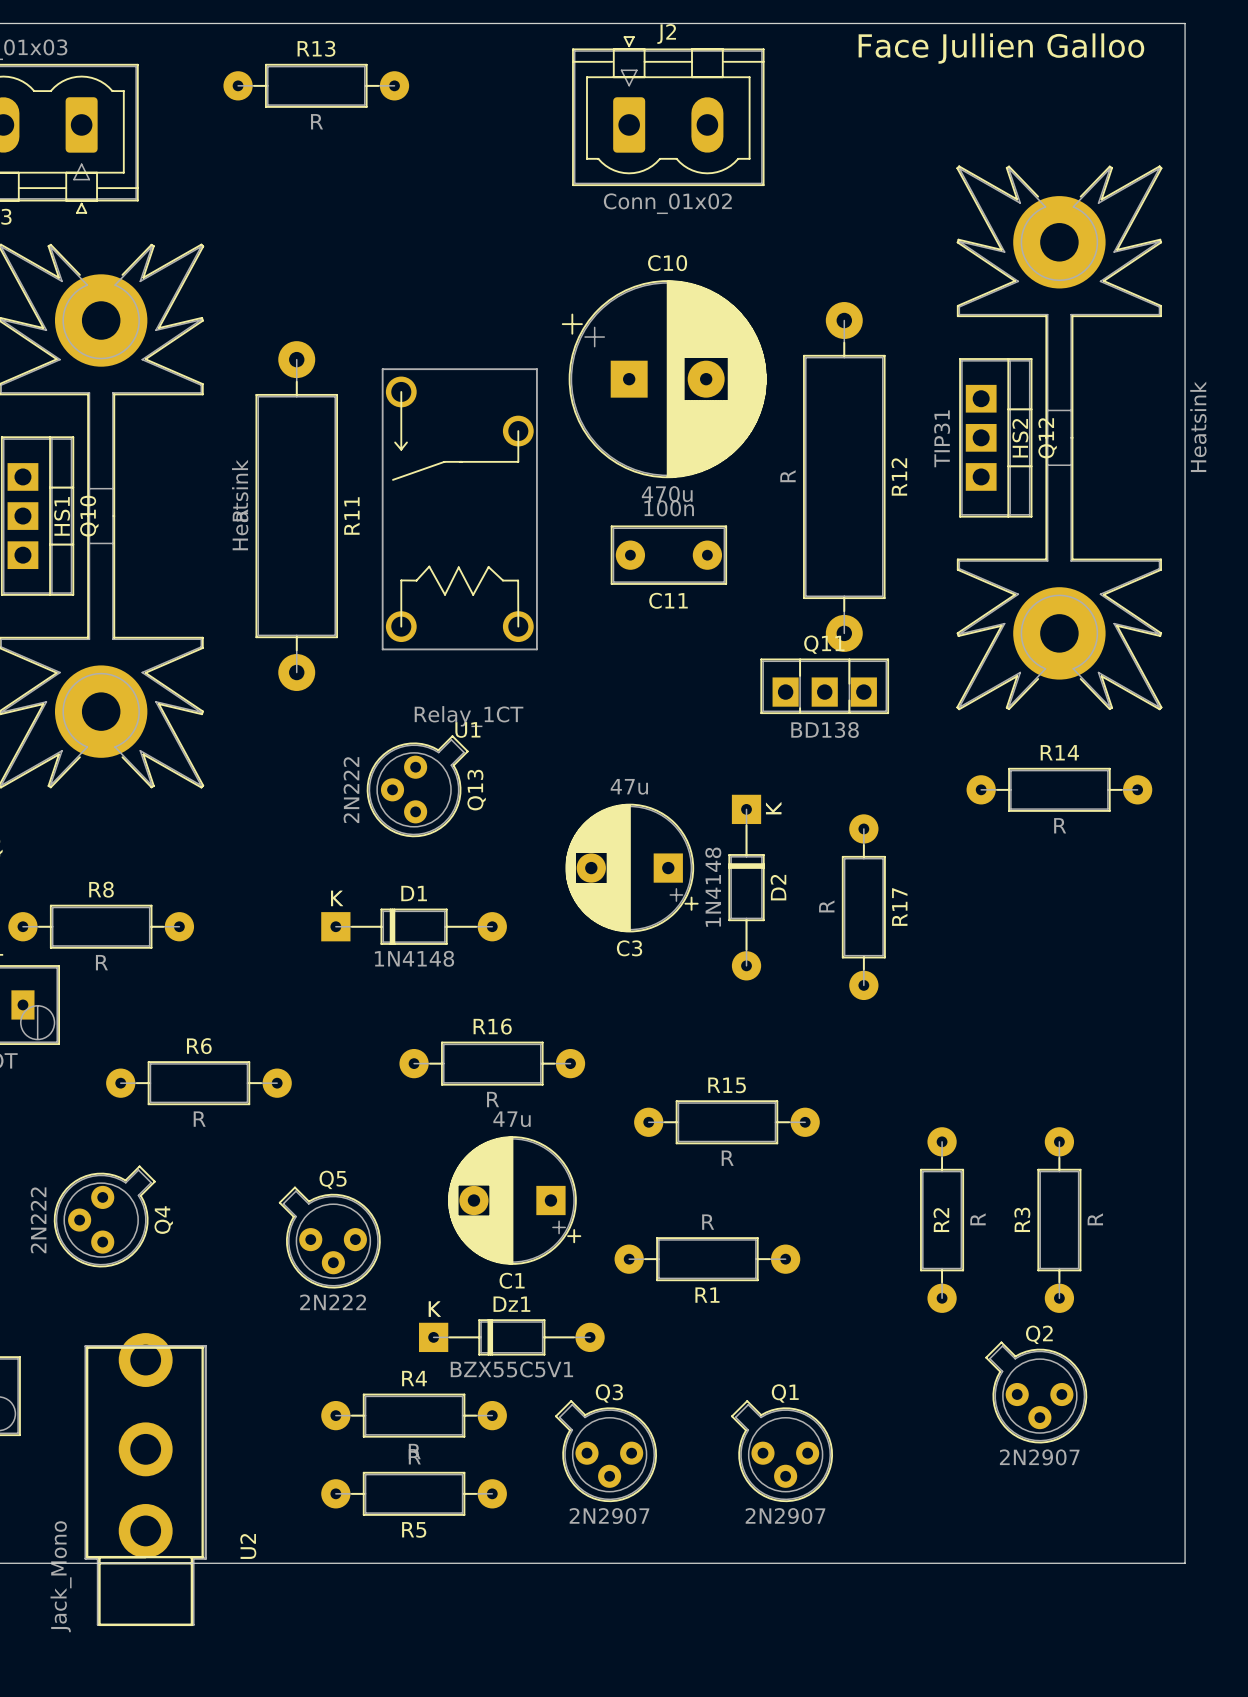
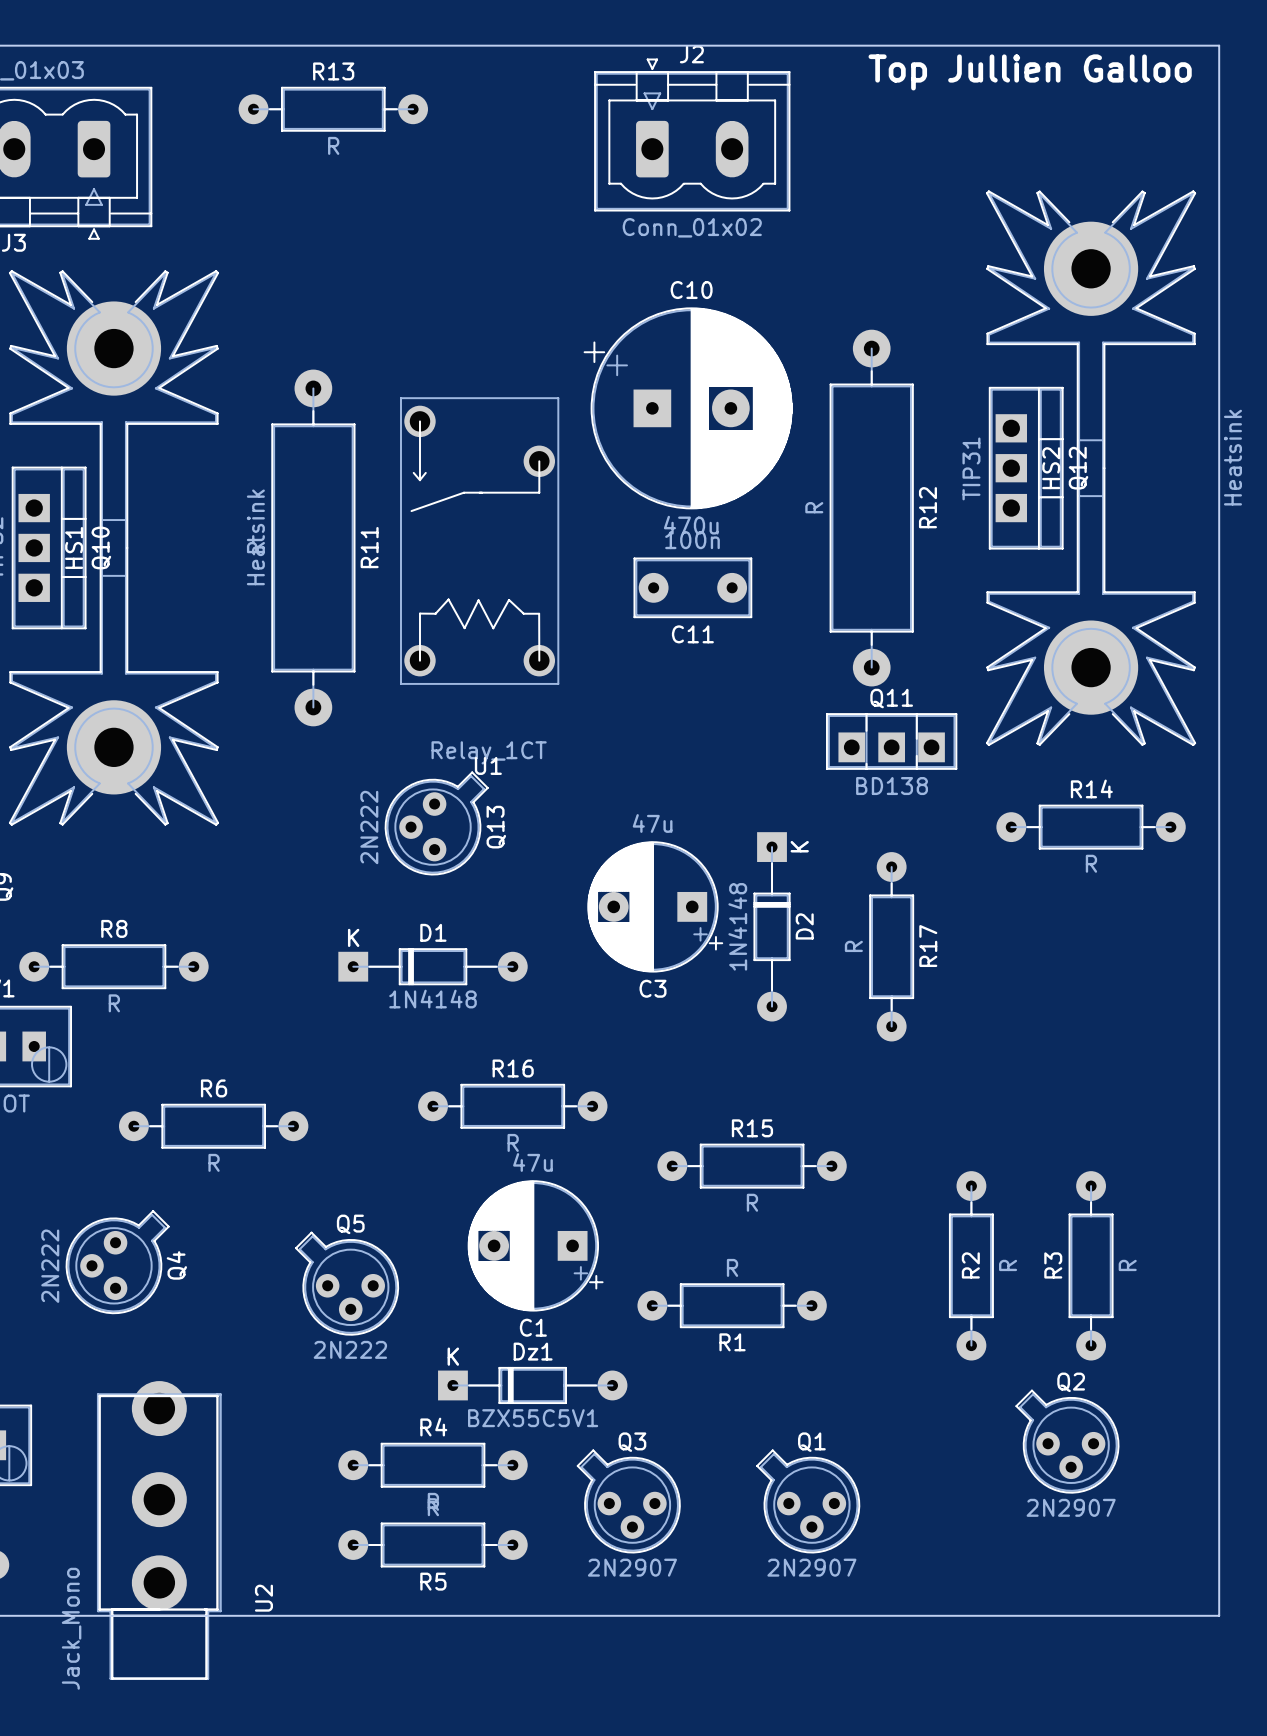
text: Face Jullien Galloo (1001, 48) -> Top Jullien Galloo (1030, 72)
Q11 position: (824, 686) -> (891, 741)

